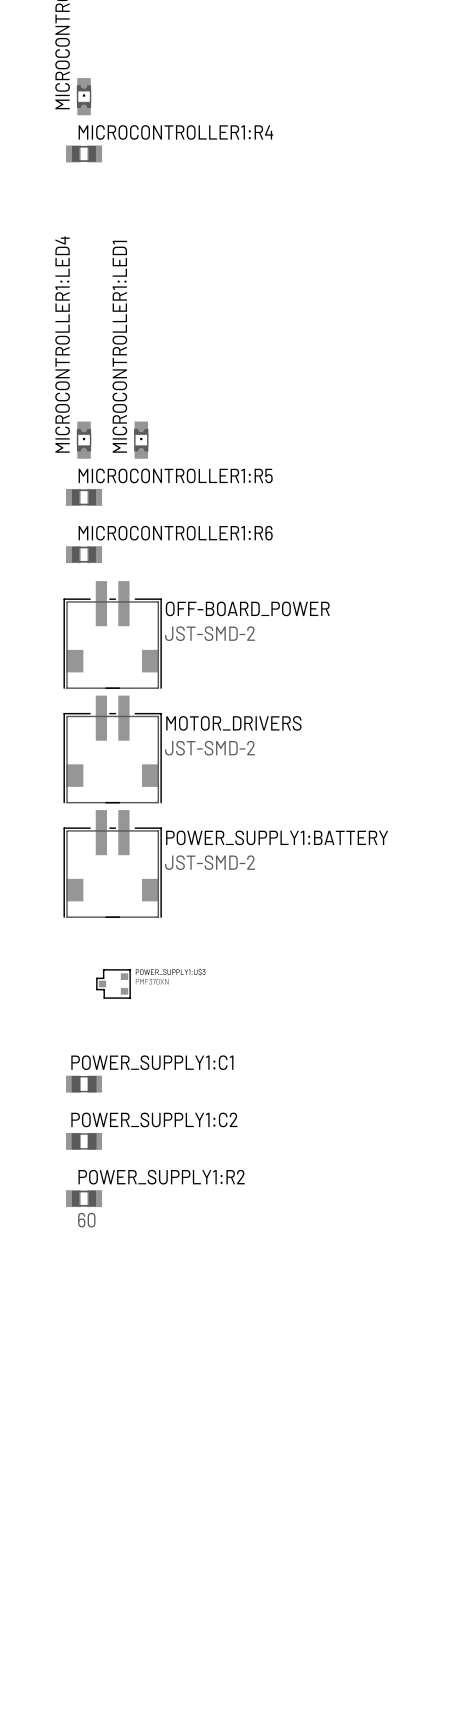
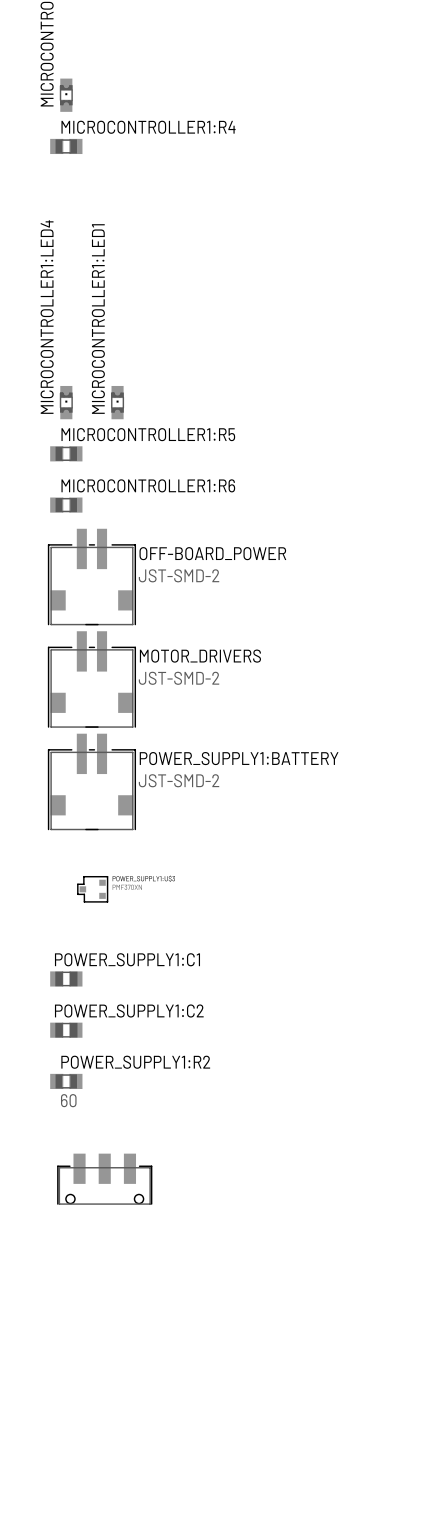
part: none -> (104, 1179)

